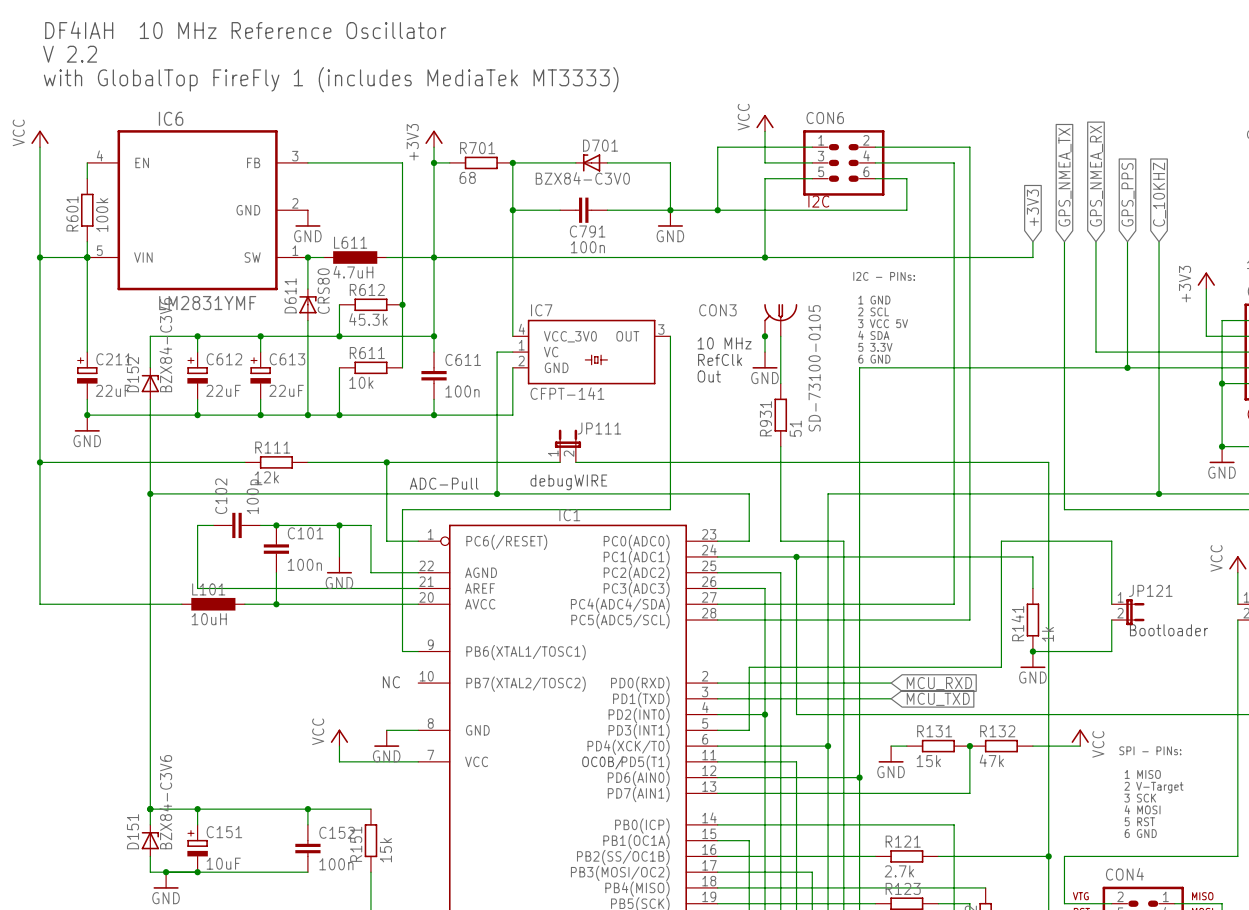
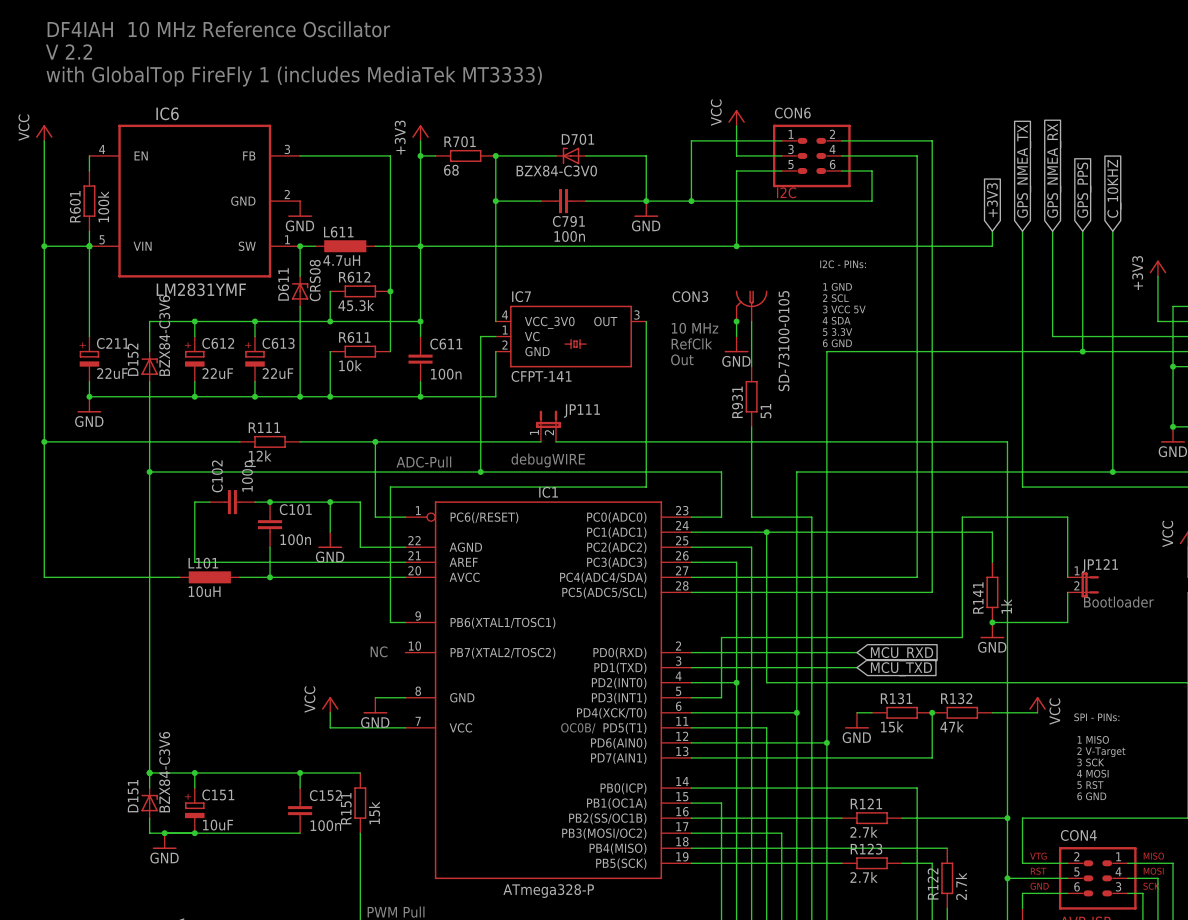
D611 value: CRS80 (323, 291) -> CRS08 (315, 280)

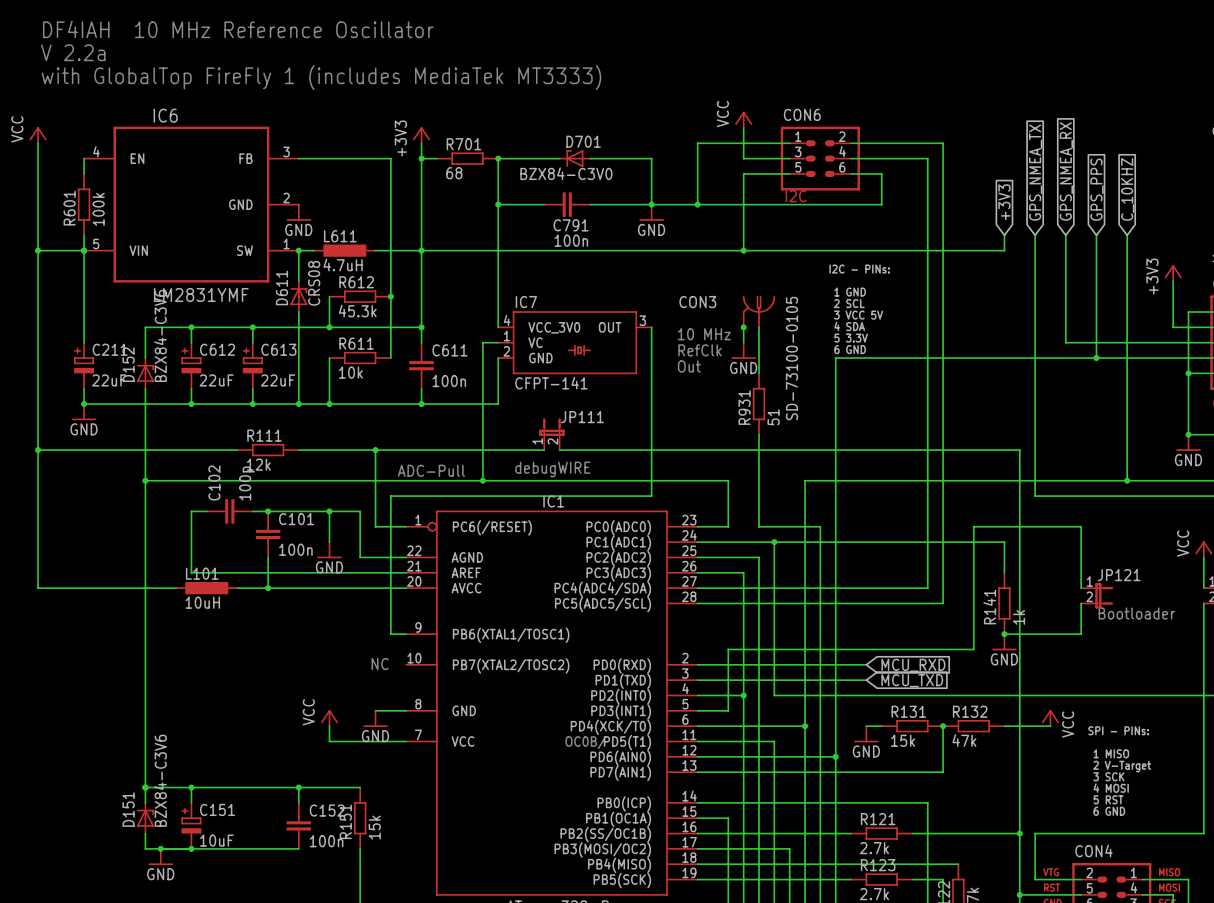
text: V 2.2 (69, 51) -> V 2.2a (73, 52)

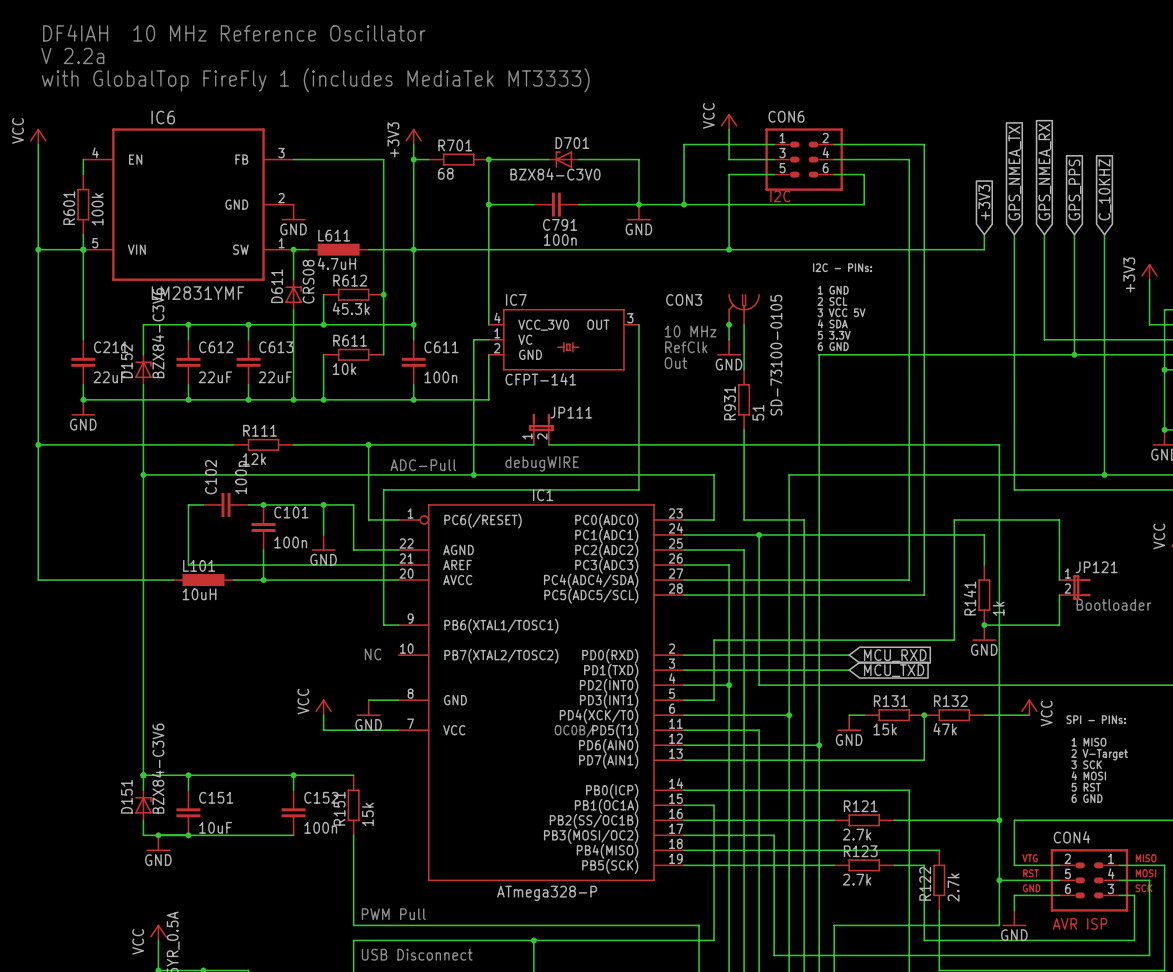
C211 symbol: [74, 342, 95, 389] -> [71, 339, 96, 385]
C612 symbol: [181, 342, 202, 389] -> [176, 339, 201, 385]
C613 symbol: [242, 342, 263, 389] -> [236, 339, 261, 385]
C151 symbol: [181, 802, 202, 849] -> [176, 790, 201, 836]

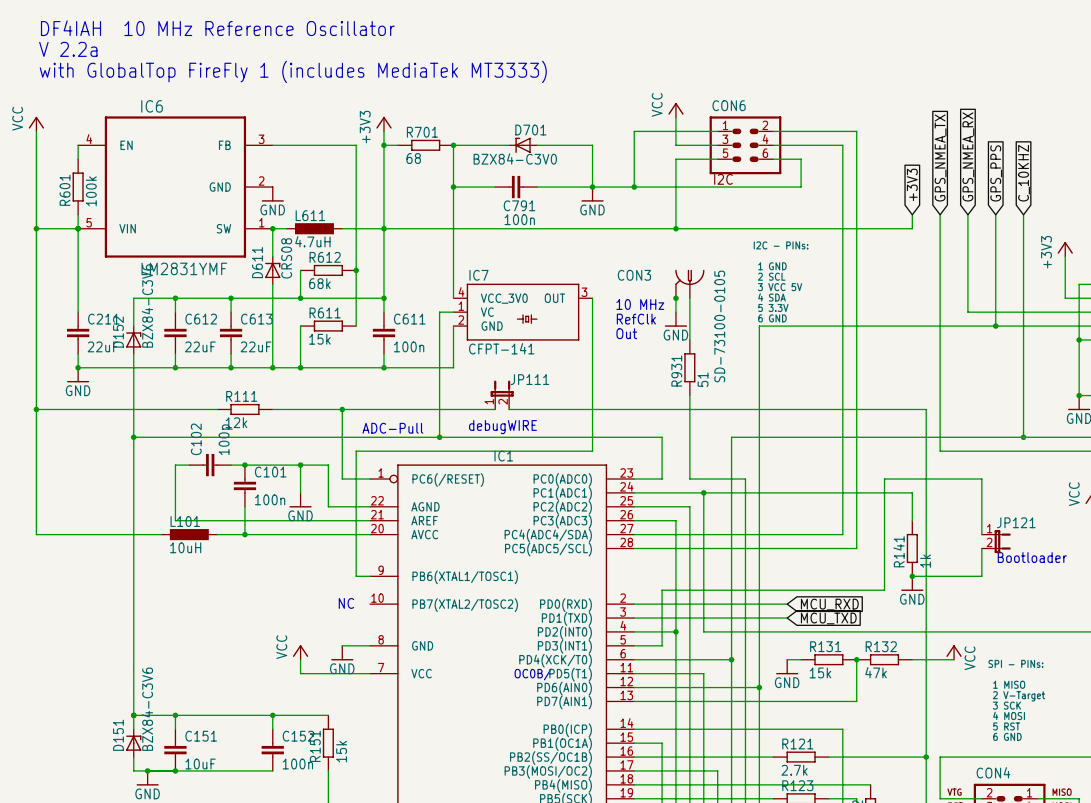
R612 value: 45.3k (351, 308) -> 68k (319, 283)
R611 value: 10k (344, 369) -> 15k (319, 339)

